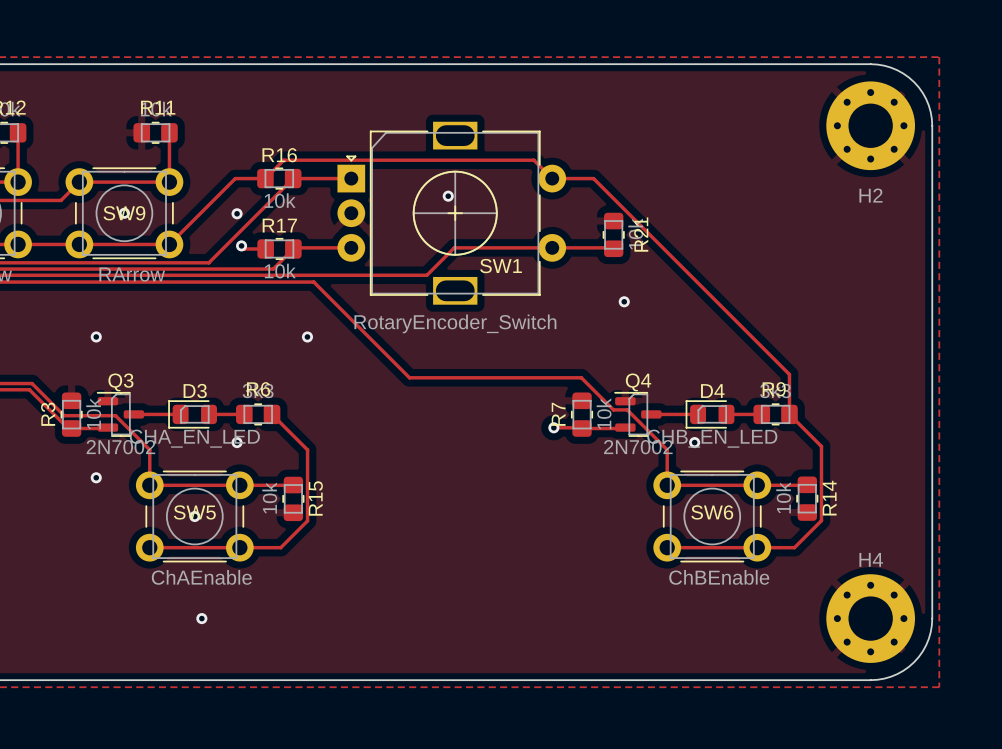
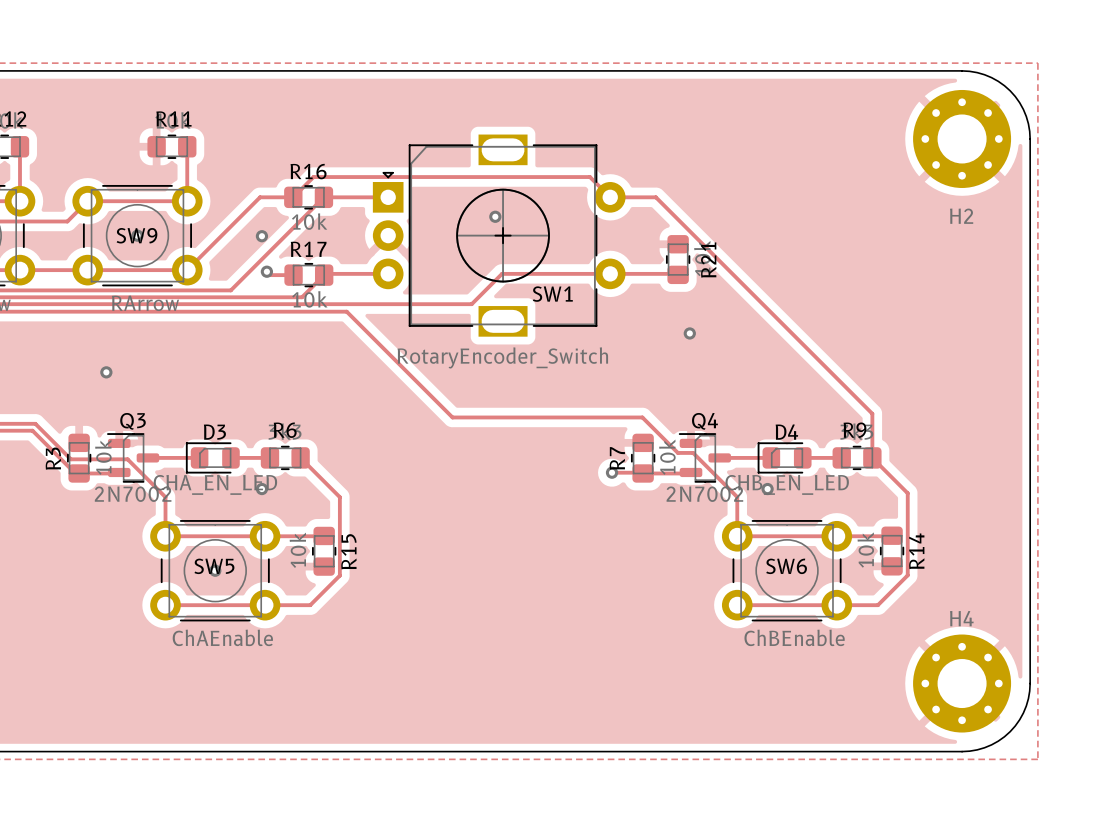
via: (307, 336) -> none
via: (96, 477) -> none
via: (201, 618) -> none

